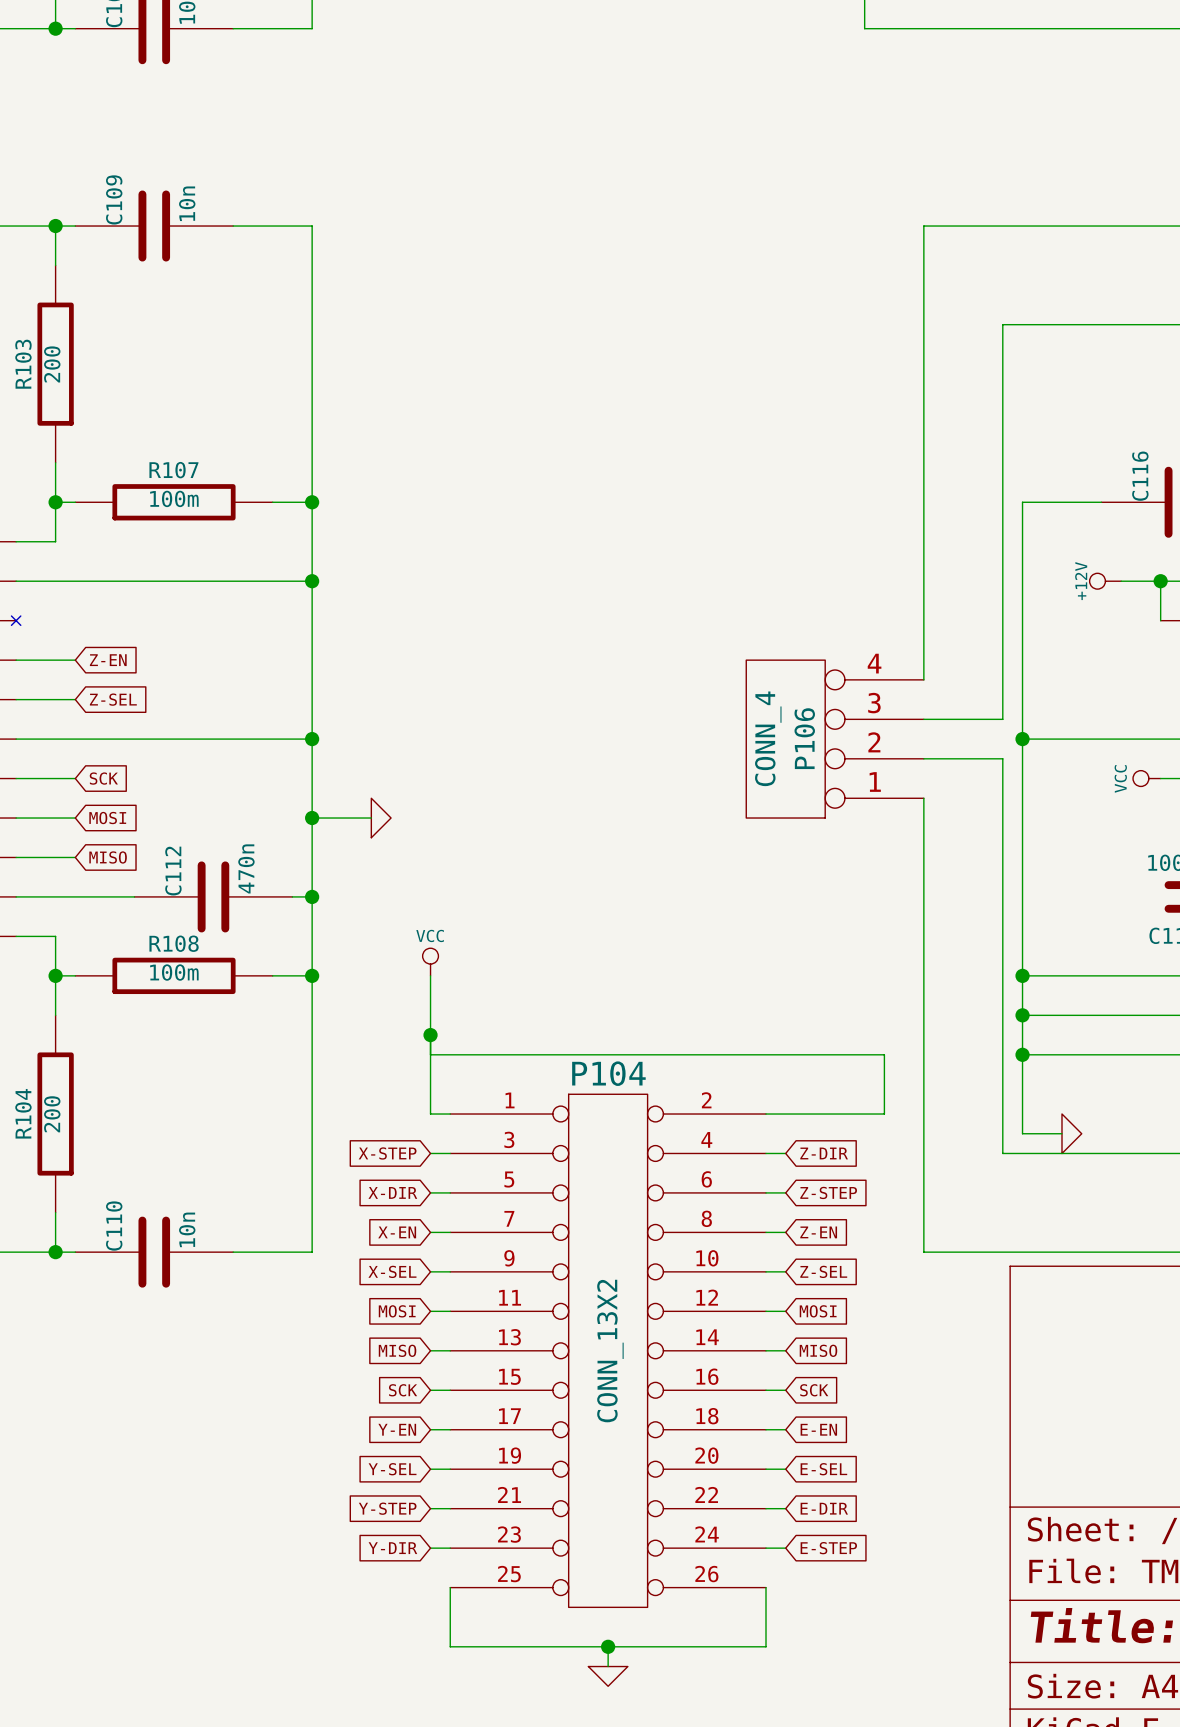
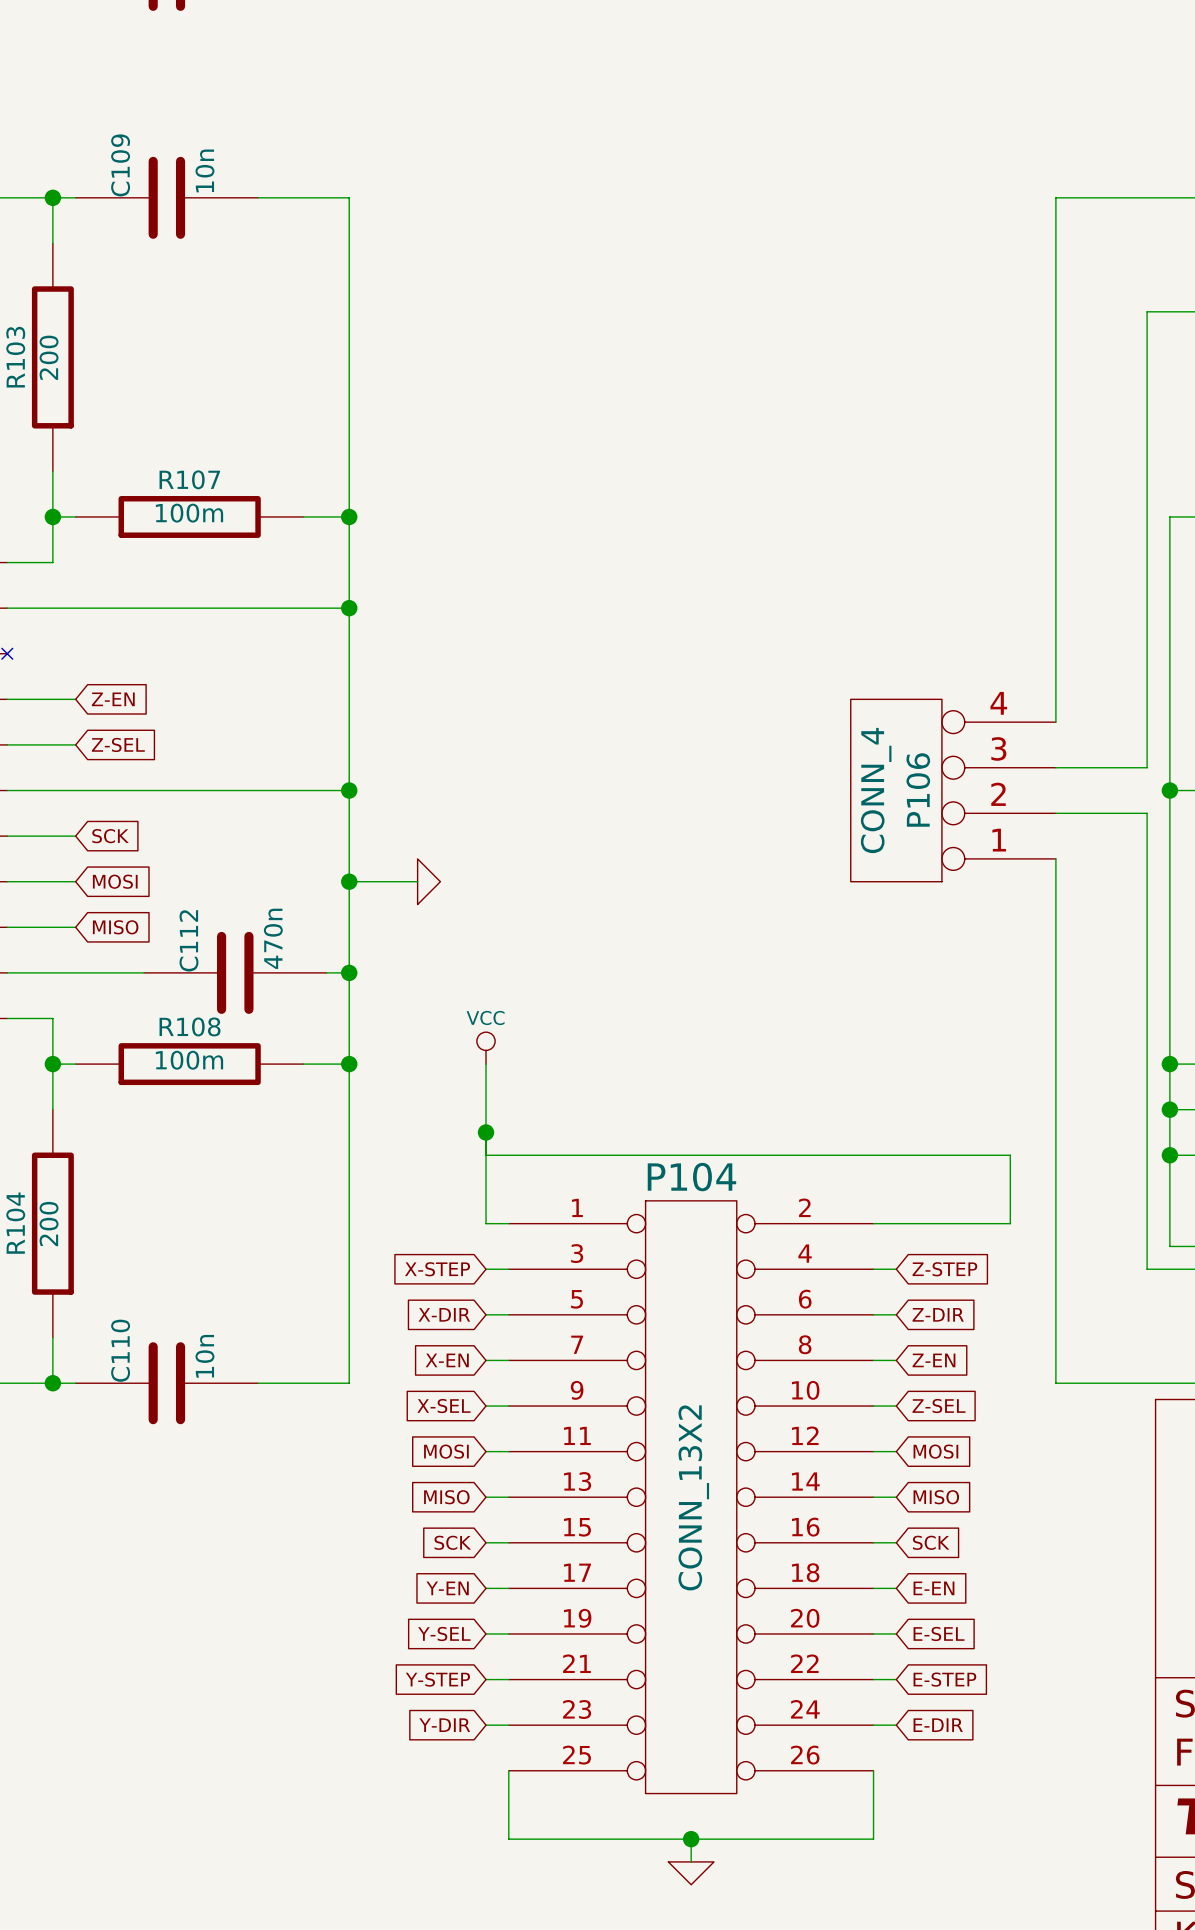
global label: Z-DIR (824, 1153) -> Z-STEP (944, 1269)
global label: Z-STEP (828, 1192) -> Z-DIR (938, 1314)
global label: E-DIR (824, 1508) -> E-STEP (944, 1679)
global label: E-STEP (828, 1548) -> E-DIR (938, 1725)

